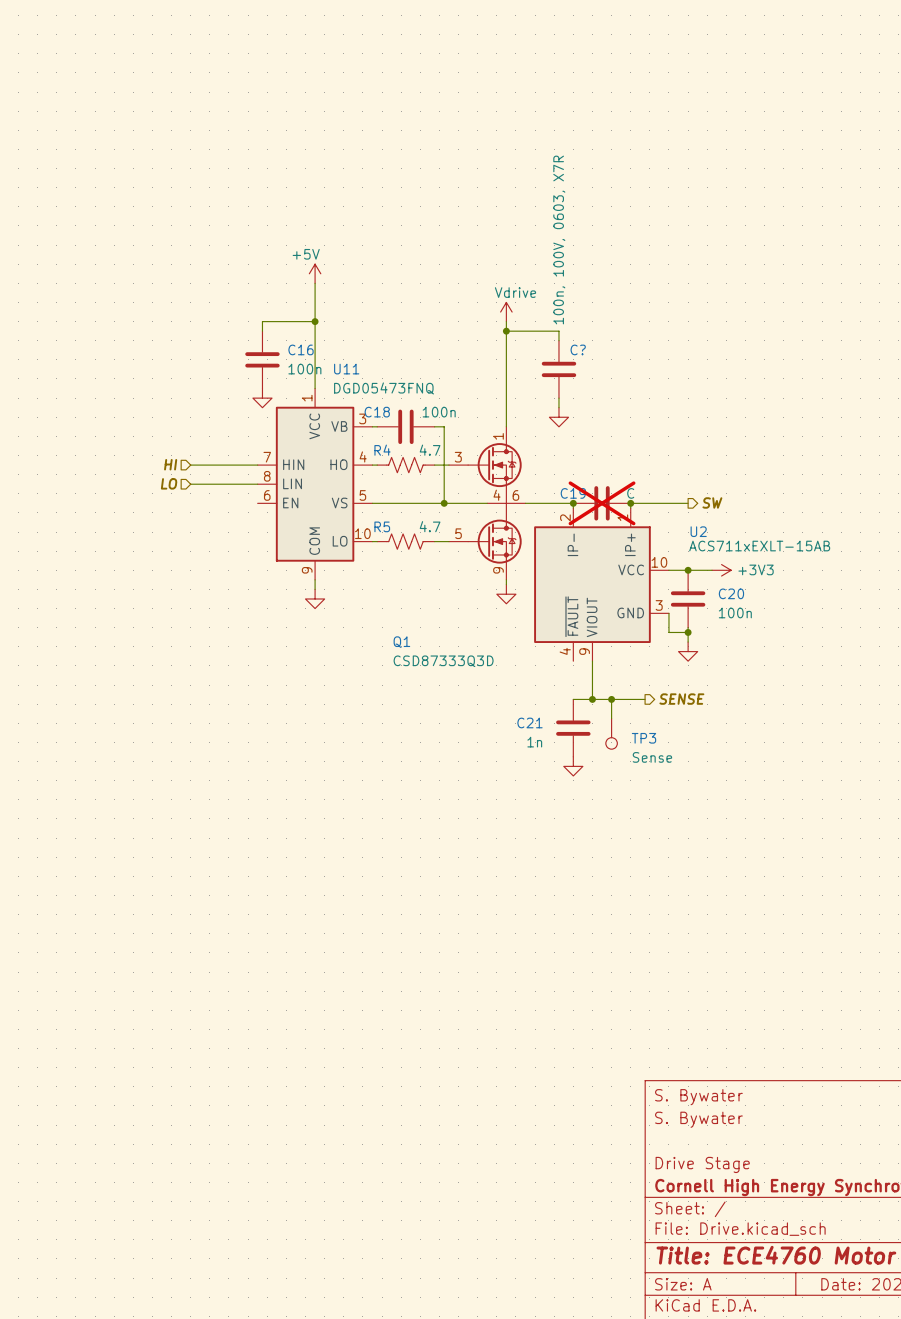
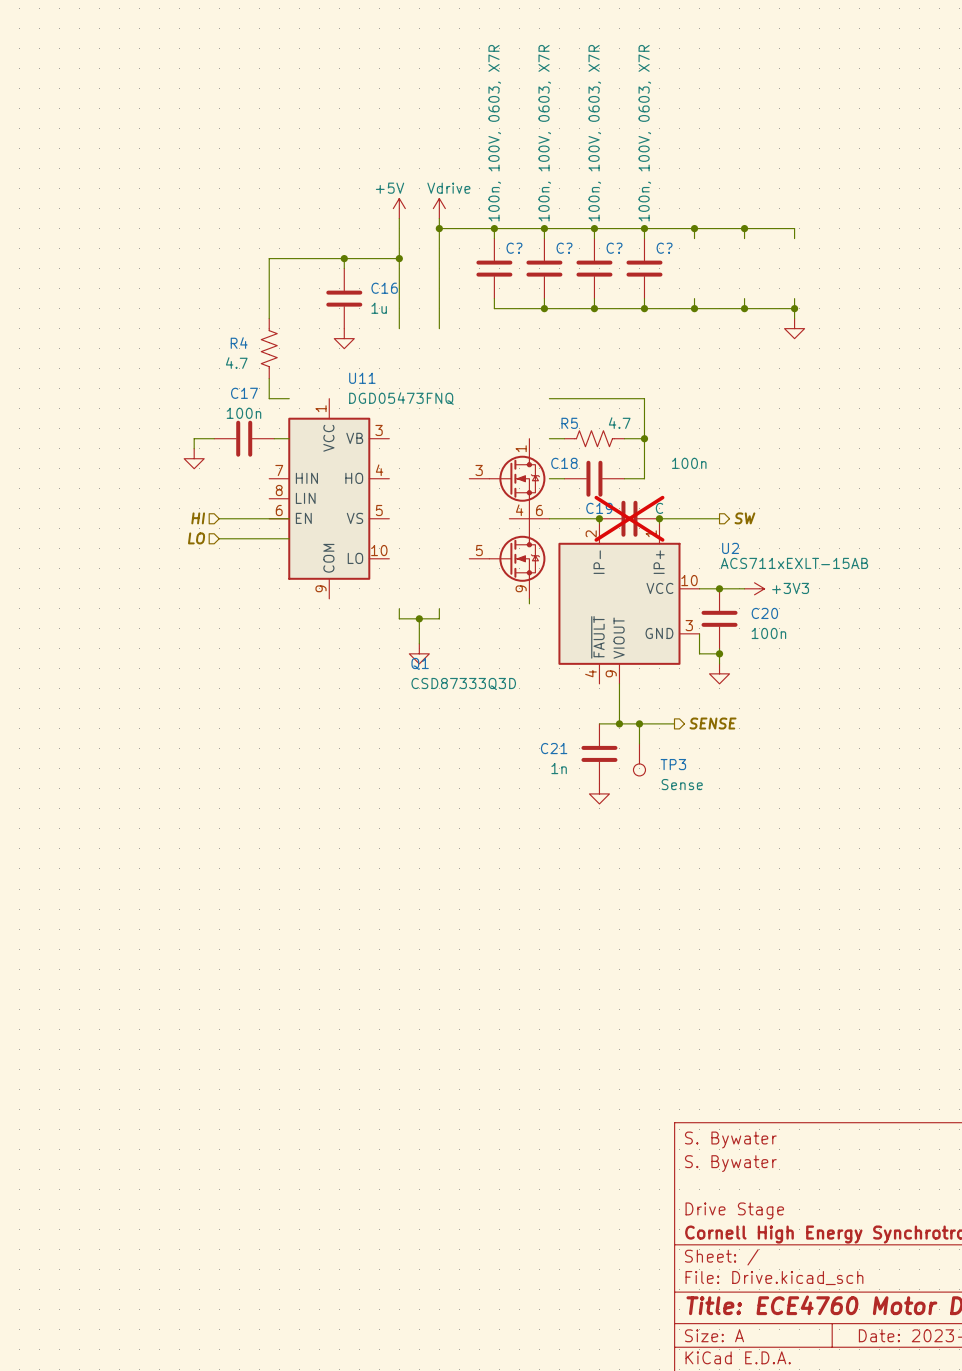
wire: none -> (439, 228) (794, 228) (794, 238)
junction: none -> (439, 228)
wire: none -> (494, 228) (494, 238)
junction: none -> (494, 228)
wire: none -> (544, 228) (544, 238)
junction: none -> (544, 228)
wire: none -> (594, 228) (594, 238)
junction: none -> (594, 228)
wire: none -> (644, 228) (644, 238)
junction: none -> (644, 228)
wire: none -> (694, 228) (694, 238)
junction: none -> (694, 228)
wire: none -> (744, 228) (744, 238)
junction: none -> (744, 228)
wire: none -> (344, 258) (344, 268)
junction: none -> (344, 258)
wire: none -> (399, 258) (269, 258) (269, 318)
junction: none -> (399, 258)
C?: none -> 100n, 100V, 0603, X7R (494, 268)
C?: none -> 100n, 100V, 0603, X7R (544, 268)
C?: none -> 100n, 100V, 0603, X7R (594, 268)
C?: none -> 100n, 100V, 0603, X7R (644, 268)
power symbol position: +5V (315, 273) -> +5V (399, 208)
wire: (315, 283) (315, 388) -> (399, 218) (399, 328)
wire: none -> (494, 298) (494, 308) (794, 308)
wire: none -> (544, 298) (544, 308)
wire: none -> (644, 298) (644, 308)
wire: none -> (694, 298) (694, 308)
wire: none -> (744, 298) (744, 308)
wire: none -> (794, 298) (794, 318)
junction: none -> (594, 308)
junction: none -> (644, 308)
junction: none -> (694, 308)
junction: none -> (744, 308)
junction: none -> (794, 308)
power symbol position: Vdrive (506, 312) -> Vdrive (439, 208)
wire: (315, 321) (262, 321) (262, 331) -> none
junction: (315, 321) -> none
wire: (506, 321) (506, 426) -> (439, 218) (439, 328)
power symbol: none -> (794, 328)
power symbol: none -> (344, 338)
wire: (506, 331) (558, 331) (558, 340) -> none
junction position: (506, 331) -> (544, 308)
C16 position: (262, 359) -> (344, 298)
wire: none -> (269, 378) (269, 398) (289, 398)
C16 value: 100n (304, 369) -> 1u (379, 308)
C?: 100n, 100V, 0603, X7R (558, 369) -> none
wire: none -> (549, 398) (644, 398) (644, 478) (624, 478)
power symbol: (262, 398) -> none
wire: (558, 398) (558, 407) -> (594, 298) (594, 308)
C18 value position: 100n (439, 412) -> 100n (689, 463)
power symbol: (558, 417) -> none
wire: none -> (214, 438) (194, 438) (194, 448)
C17: none -> 100n (244, 438)
wire: none -> (274, 438) (289, 438)
wire: (372, 426) (377, 426) -> none
C18 position: (405, 426) -> (594, 478)
wire: (434, 426) (444, 426) (444, 503) -> none
wire: none -> (624, 438) (644, 438)
junction: none -> (644, 438)
power symbol: none -> (194, 458)
R4 value position: 4.7 (430, 450) -> 4.7 (236, 363)
hierarchical label position: HI (170, 464) -> HI (198, 518)
wire: (190, 465) (257, 465) -> (219, 518) (289, 518)
wire: (372, 465) (377, 465) -> none
R4 rotation: 0° (405, 465) -> 90° clockwise (269, 348)
R4 position: (405, 465) -> (269, 348)
wire: (434, 465) (448, 465) -> (549, 478) (564, 478)
hierarchical label position: LO (169, 483) -> LO (196, 538)
wire: (190, 484) (257, 484) -> (219, 538) (289, 538)
wire: (372, 503) (487, 503) -> none
junction: (444, 503) -> none
wire: (372, 541) (377, 541) -> none
R5 position: (405, 541) -> (594, 438)
wire: (434, 541) (448, 541) -> (549, 438) (564, 438)
wire: (315, 579) (315, 589) -> none
wire: none -> (399, 608) (399, 618) (439, 618) (439, 608)
power symbol: (506, 594) -> none
power symbol: (315, 598) -> none
wire: none -> (419, 618) (419, 643)
junction: none -> (419, 618)
power symbol: none -> (419, 653)

